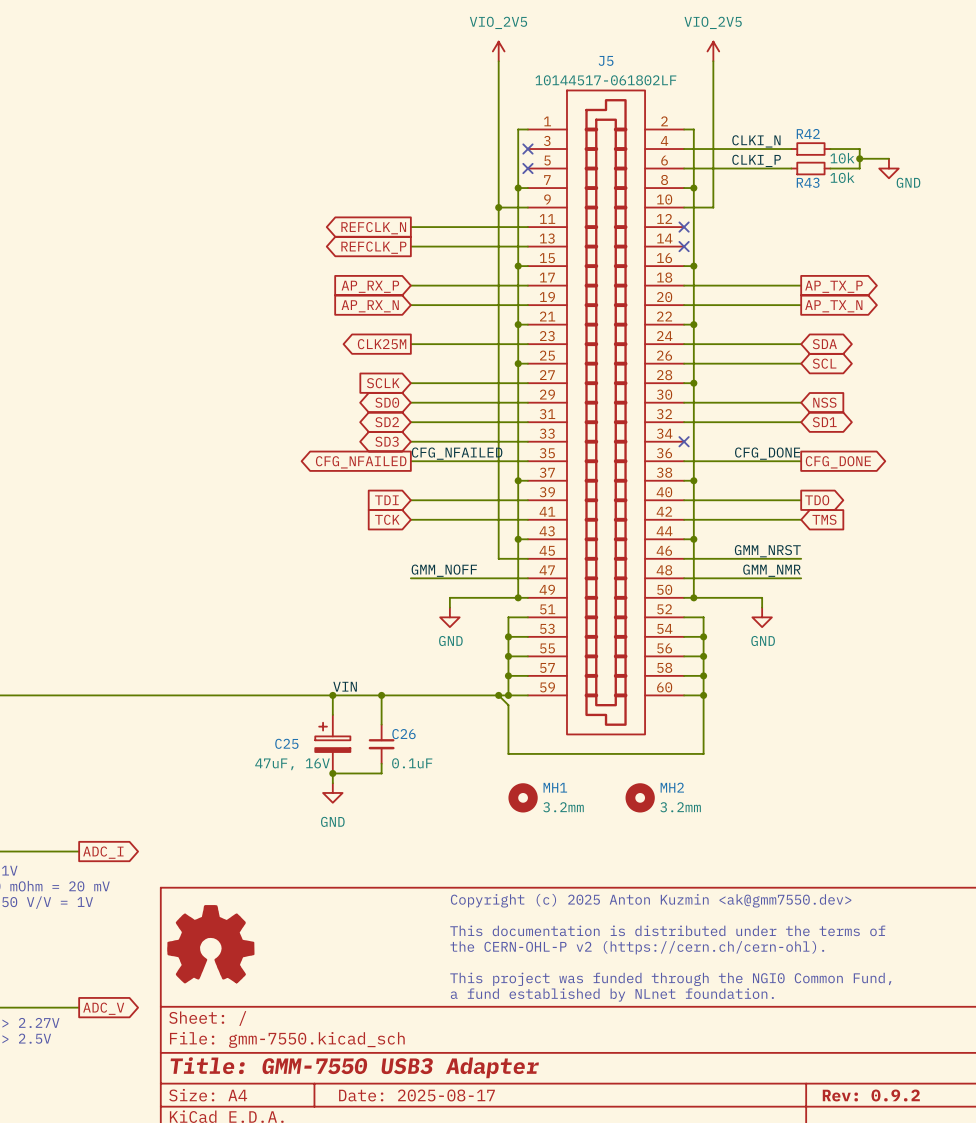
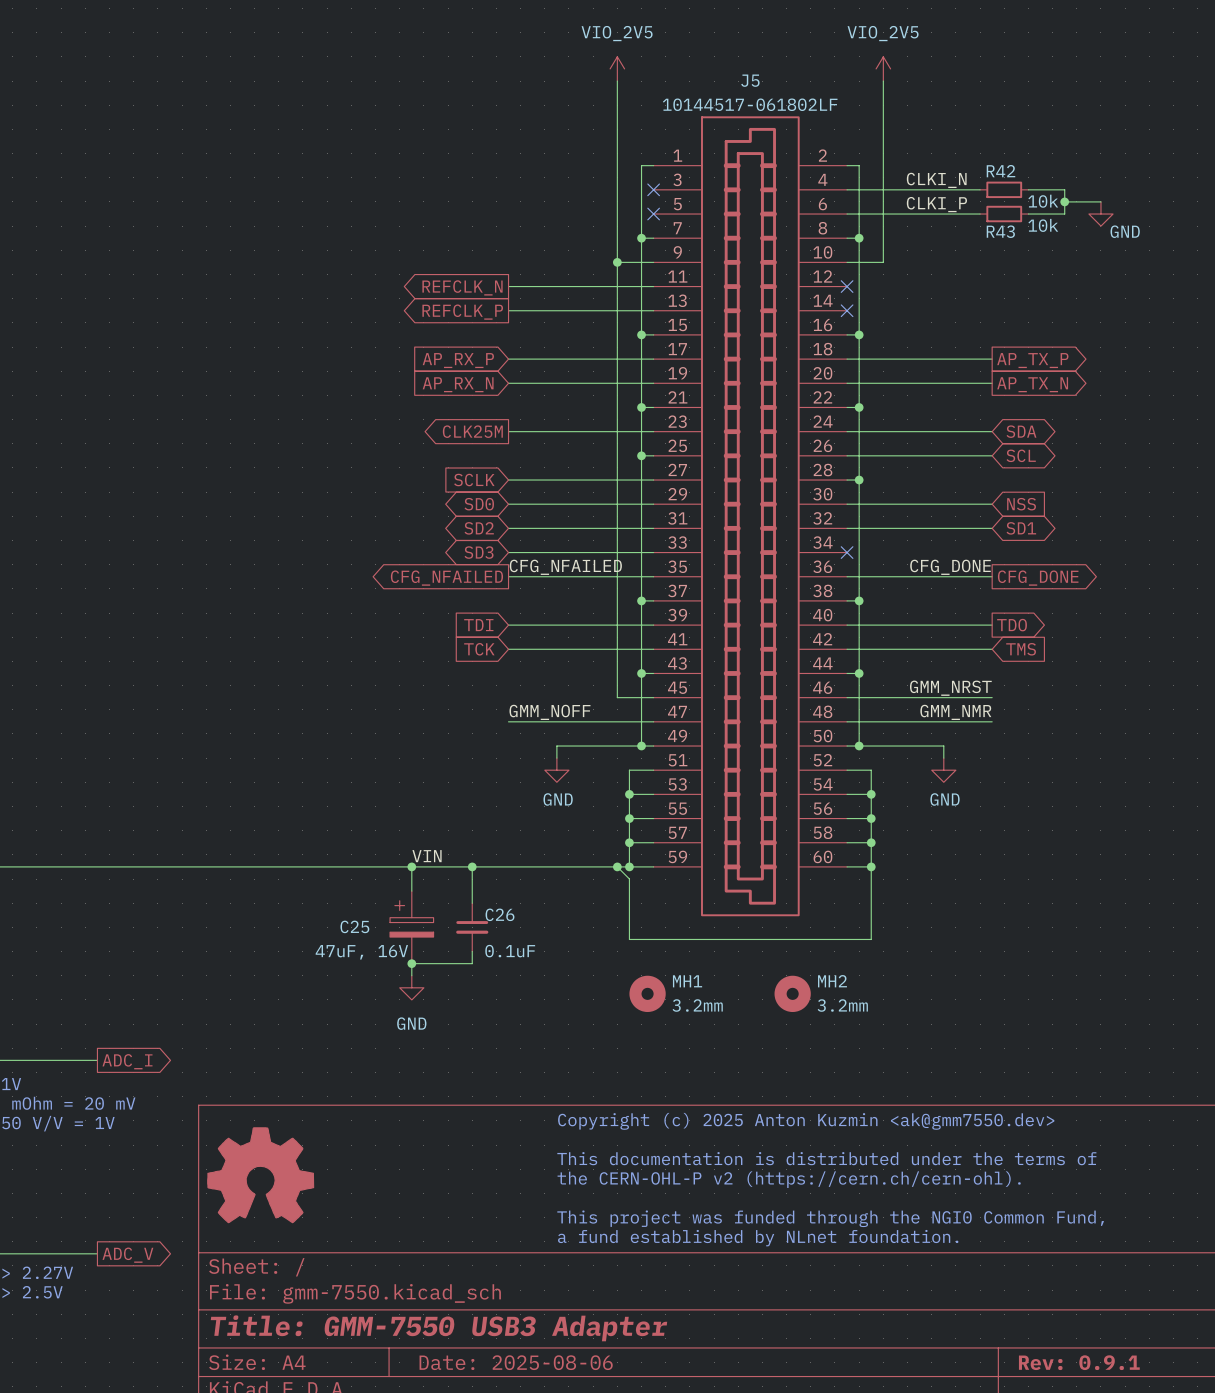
title block: Date: 2025-08-17 (416, 1095) -> Date: 2025-08-06 (516, 1362)
title block: Rev: 0.9.2 (871, 1095) -> Rev: 0.9.1 (1079, 1362)

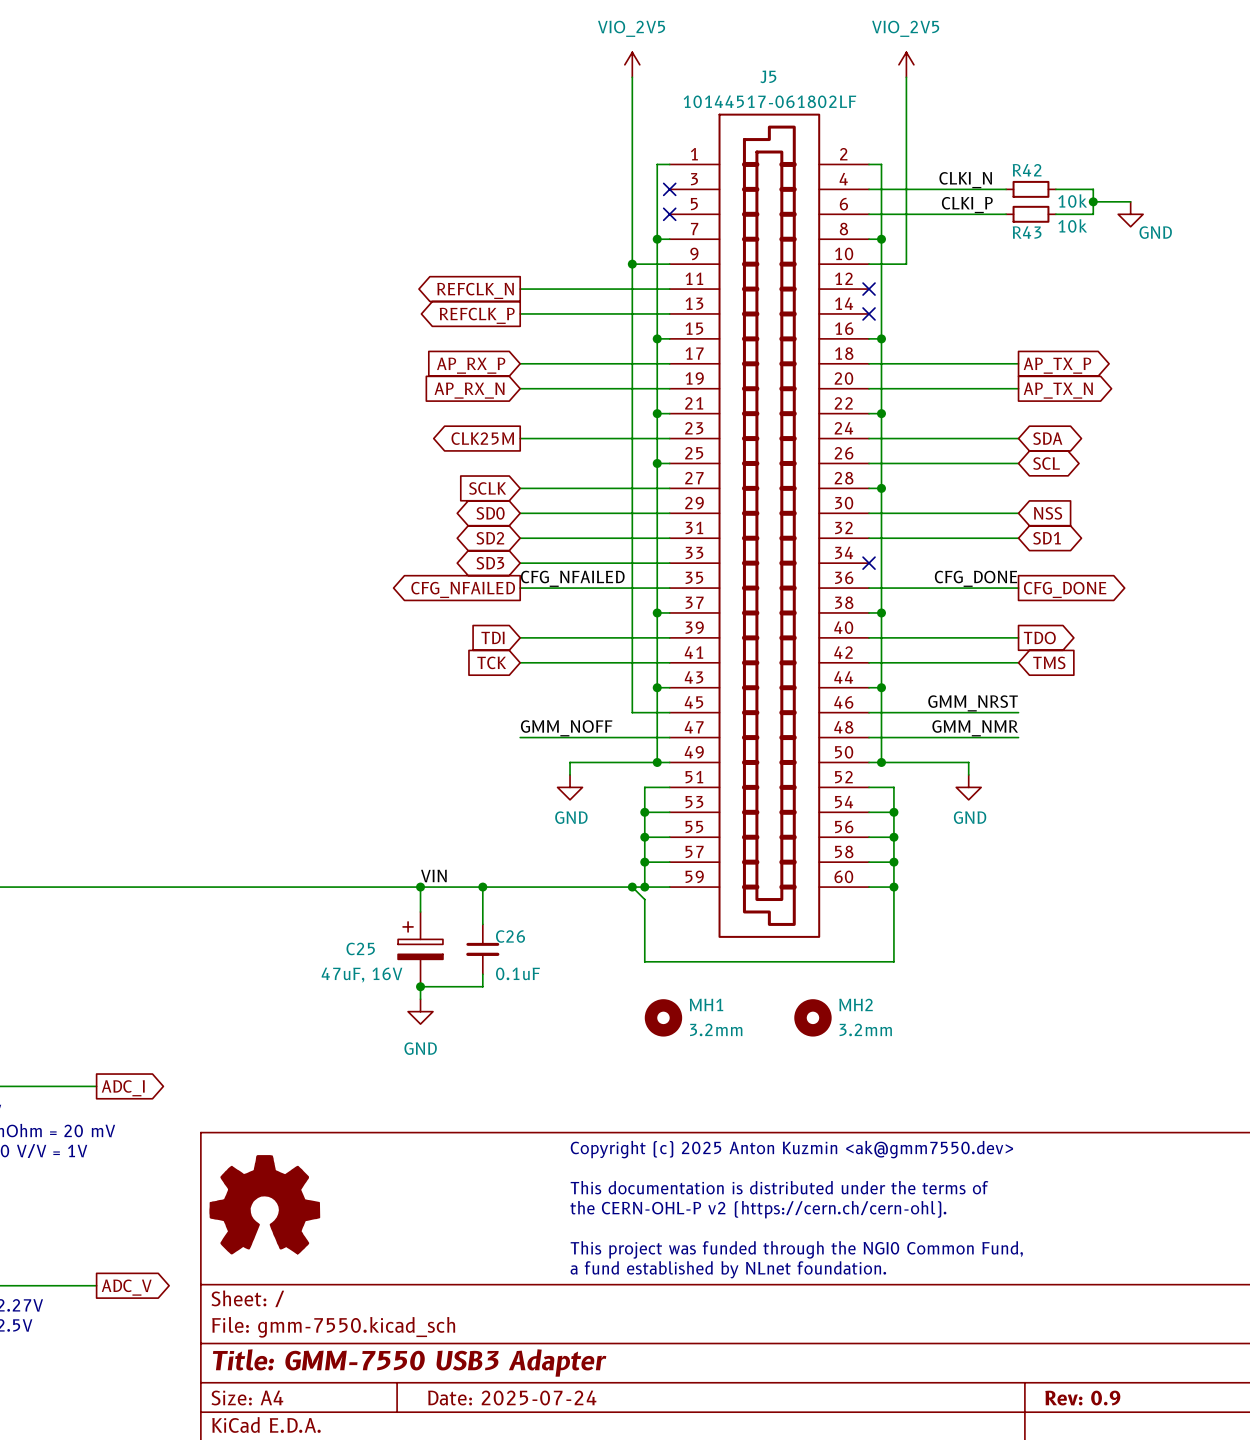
title block: Date: 2025-08-06 (516, 1362) -> Date: 2025-07-24 (512, 1397)
title block: Rev: 0.9.1 (1079, 1362) -> Rev: 0.9 (1082, 1398)

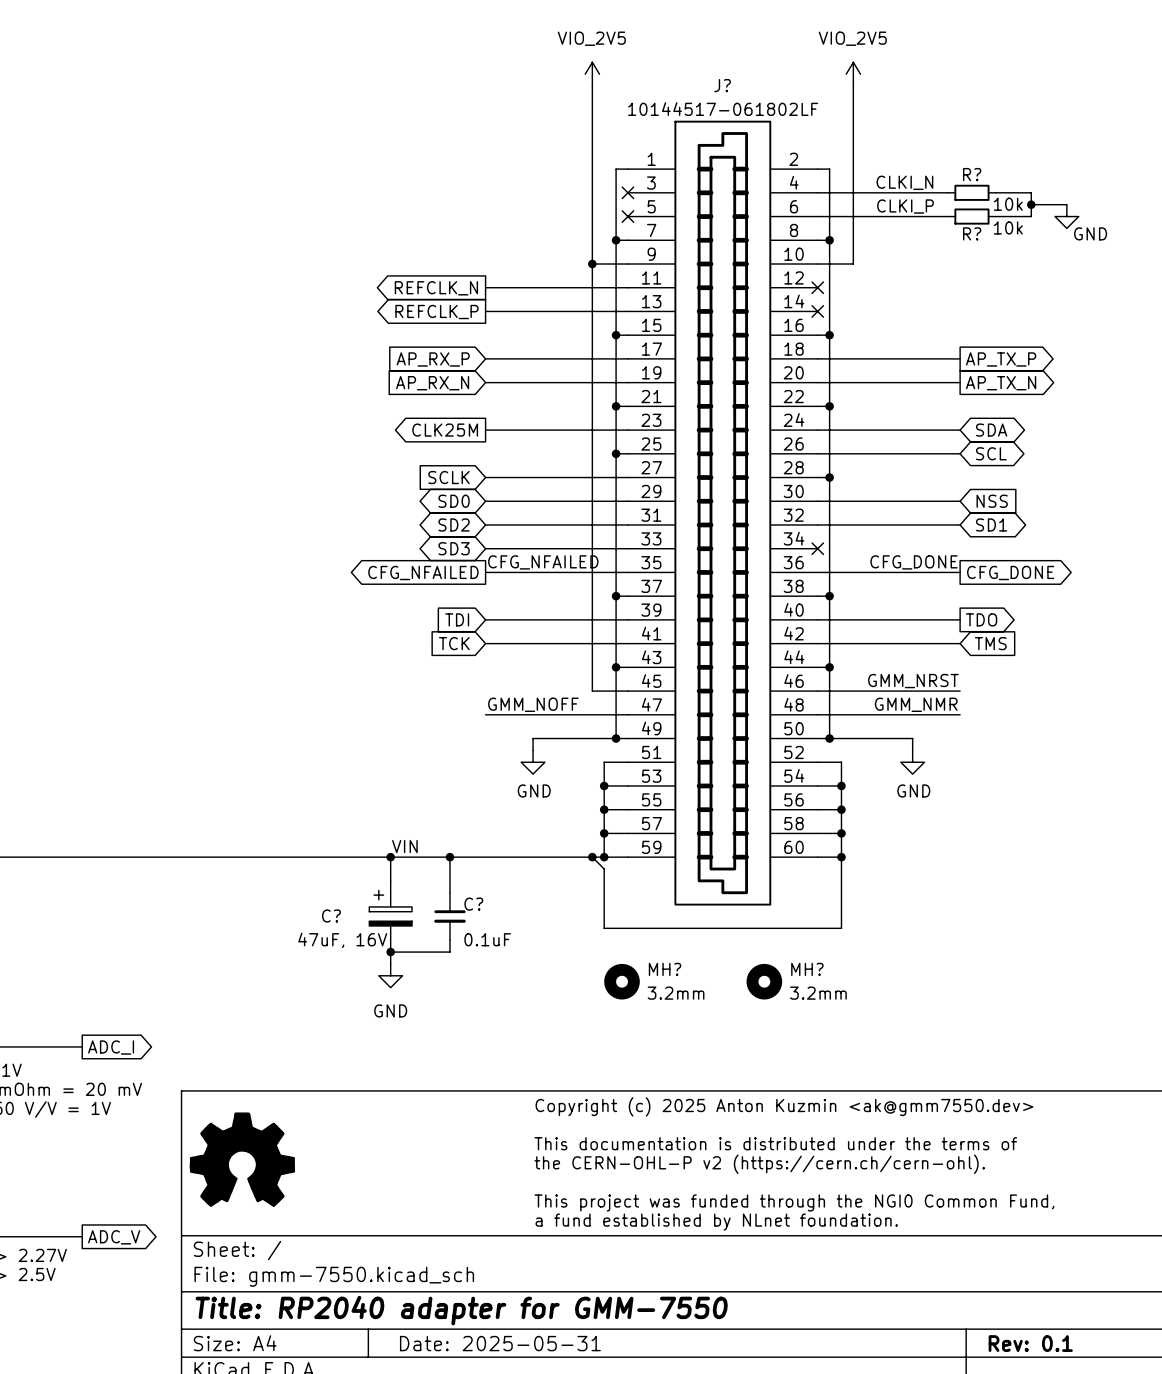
J5 name: J5 (768, 76) -> J? (722, 85)
R42 name: R42 (1027, 170) -> R? (972, 174)
R43 name: R43 (1027, 232) -> R? (972, 233)
C26 name: C26 (510, 936) -> C? (473, 904)
C25 name: C25 (360, 948) -> C? (331, 916)
MH1 name: MH1 (706, 1004) -> MH? (665, 969)
MH2 name: MH2 (856, 1004) -> MH? (807, 969)
title block: Title: GMM-7550 USB3 Adapter (409, 1362) -> Title: RP2040 adapter for GMM-7550 (461, 1310)
title block: Date: 2025-07-24 (512, 1397) -> Date: 2025-05-31 (500, 1343)
title block: Rev: 0.9 (1082, 1398) -> Rev: 0.1 (1030, 1343)

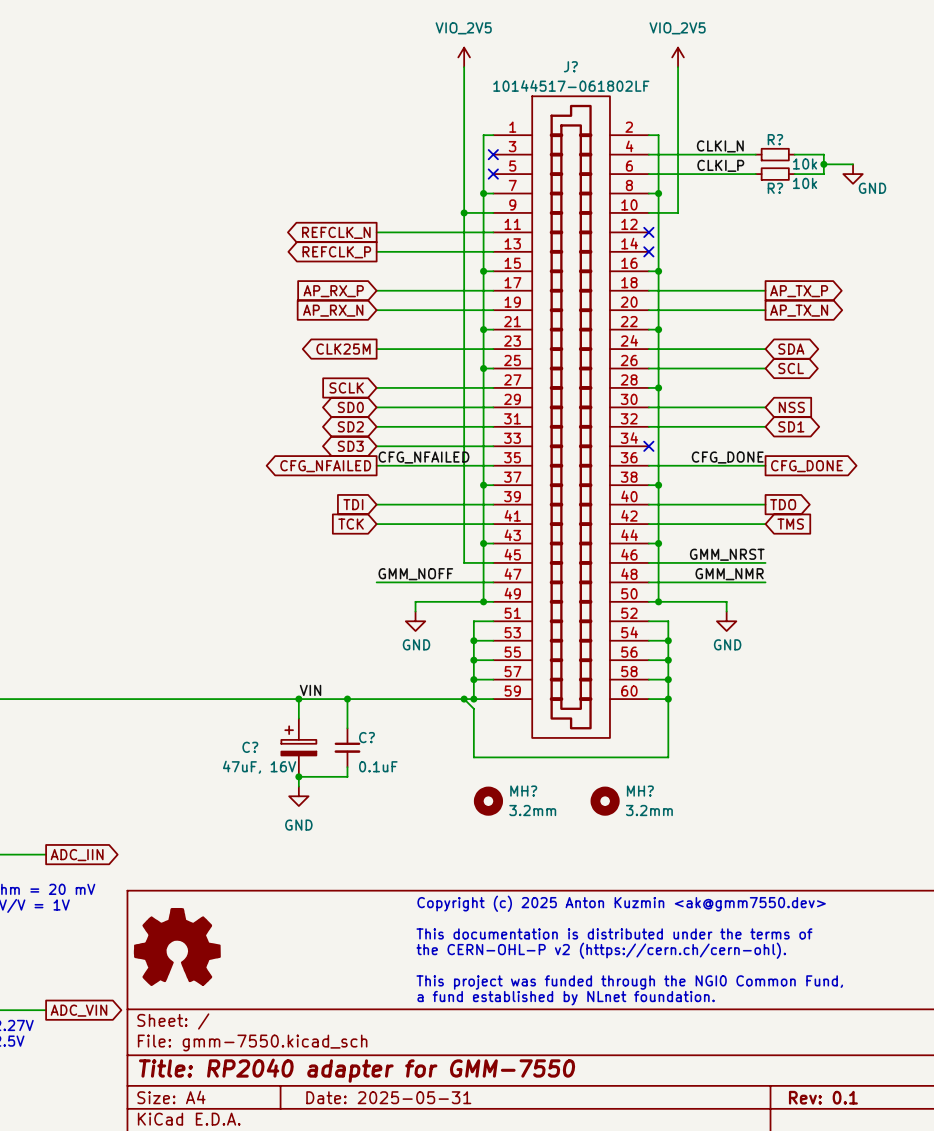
global label: ADC_I (111, 1047) -> ADC_IIN (77, 855)
global label: ADC_V (114, 1237) -> ADC_VIN (78, 1010)

